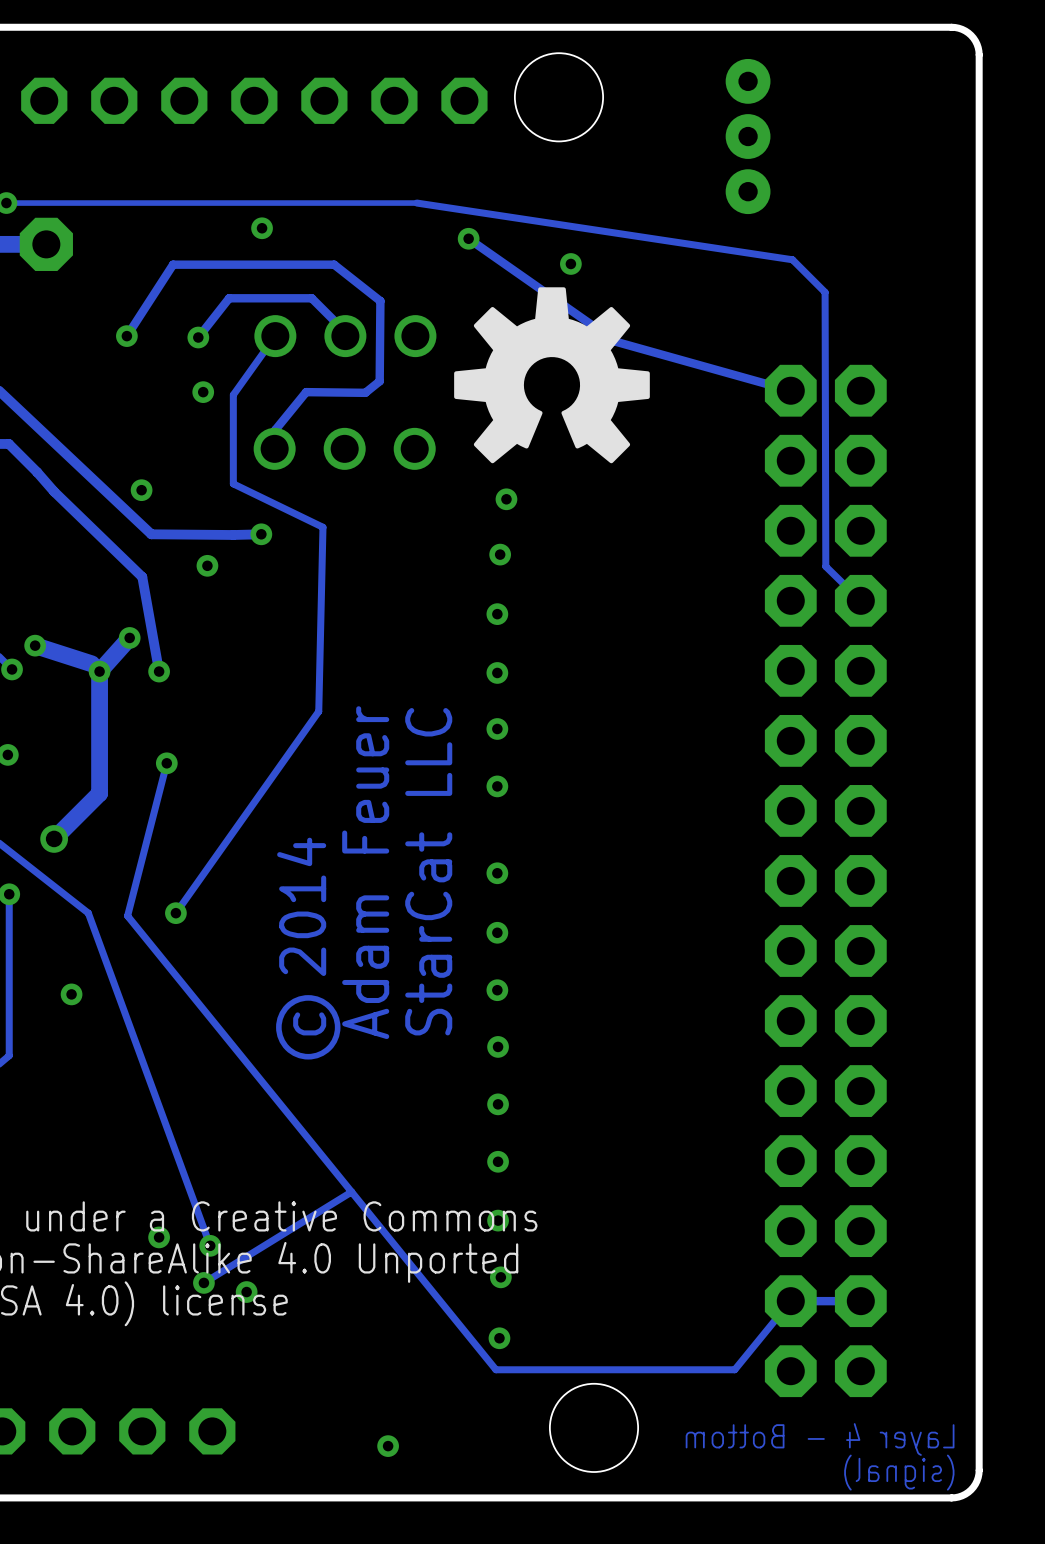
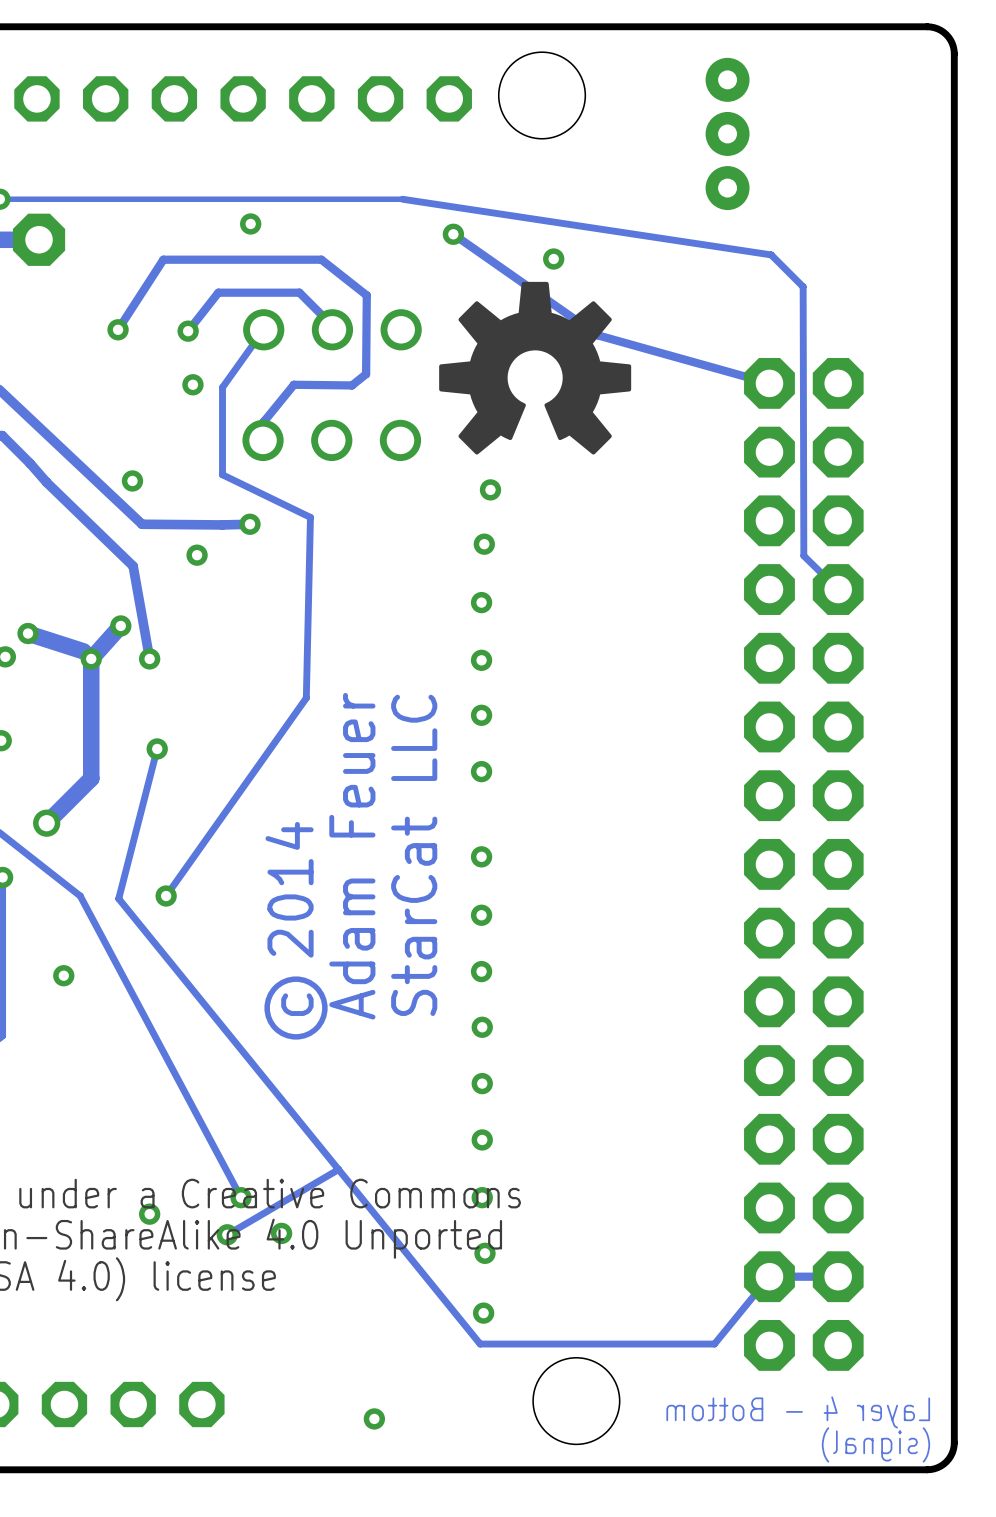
track: (88, 913) (210, 1245) -> (80, 896) (241, 1197)
track: (351, 1191) (203, 1282) -> (338, 1169) (227, 1234)
via: none -> (241, 1197)
via: (210, 1245) -> none
via: none -> (281, 1233)
via: none -> (227, 1234)
via: (203, 1282) -> none
via: (246, 1292) -> none

